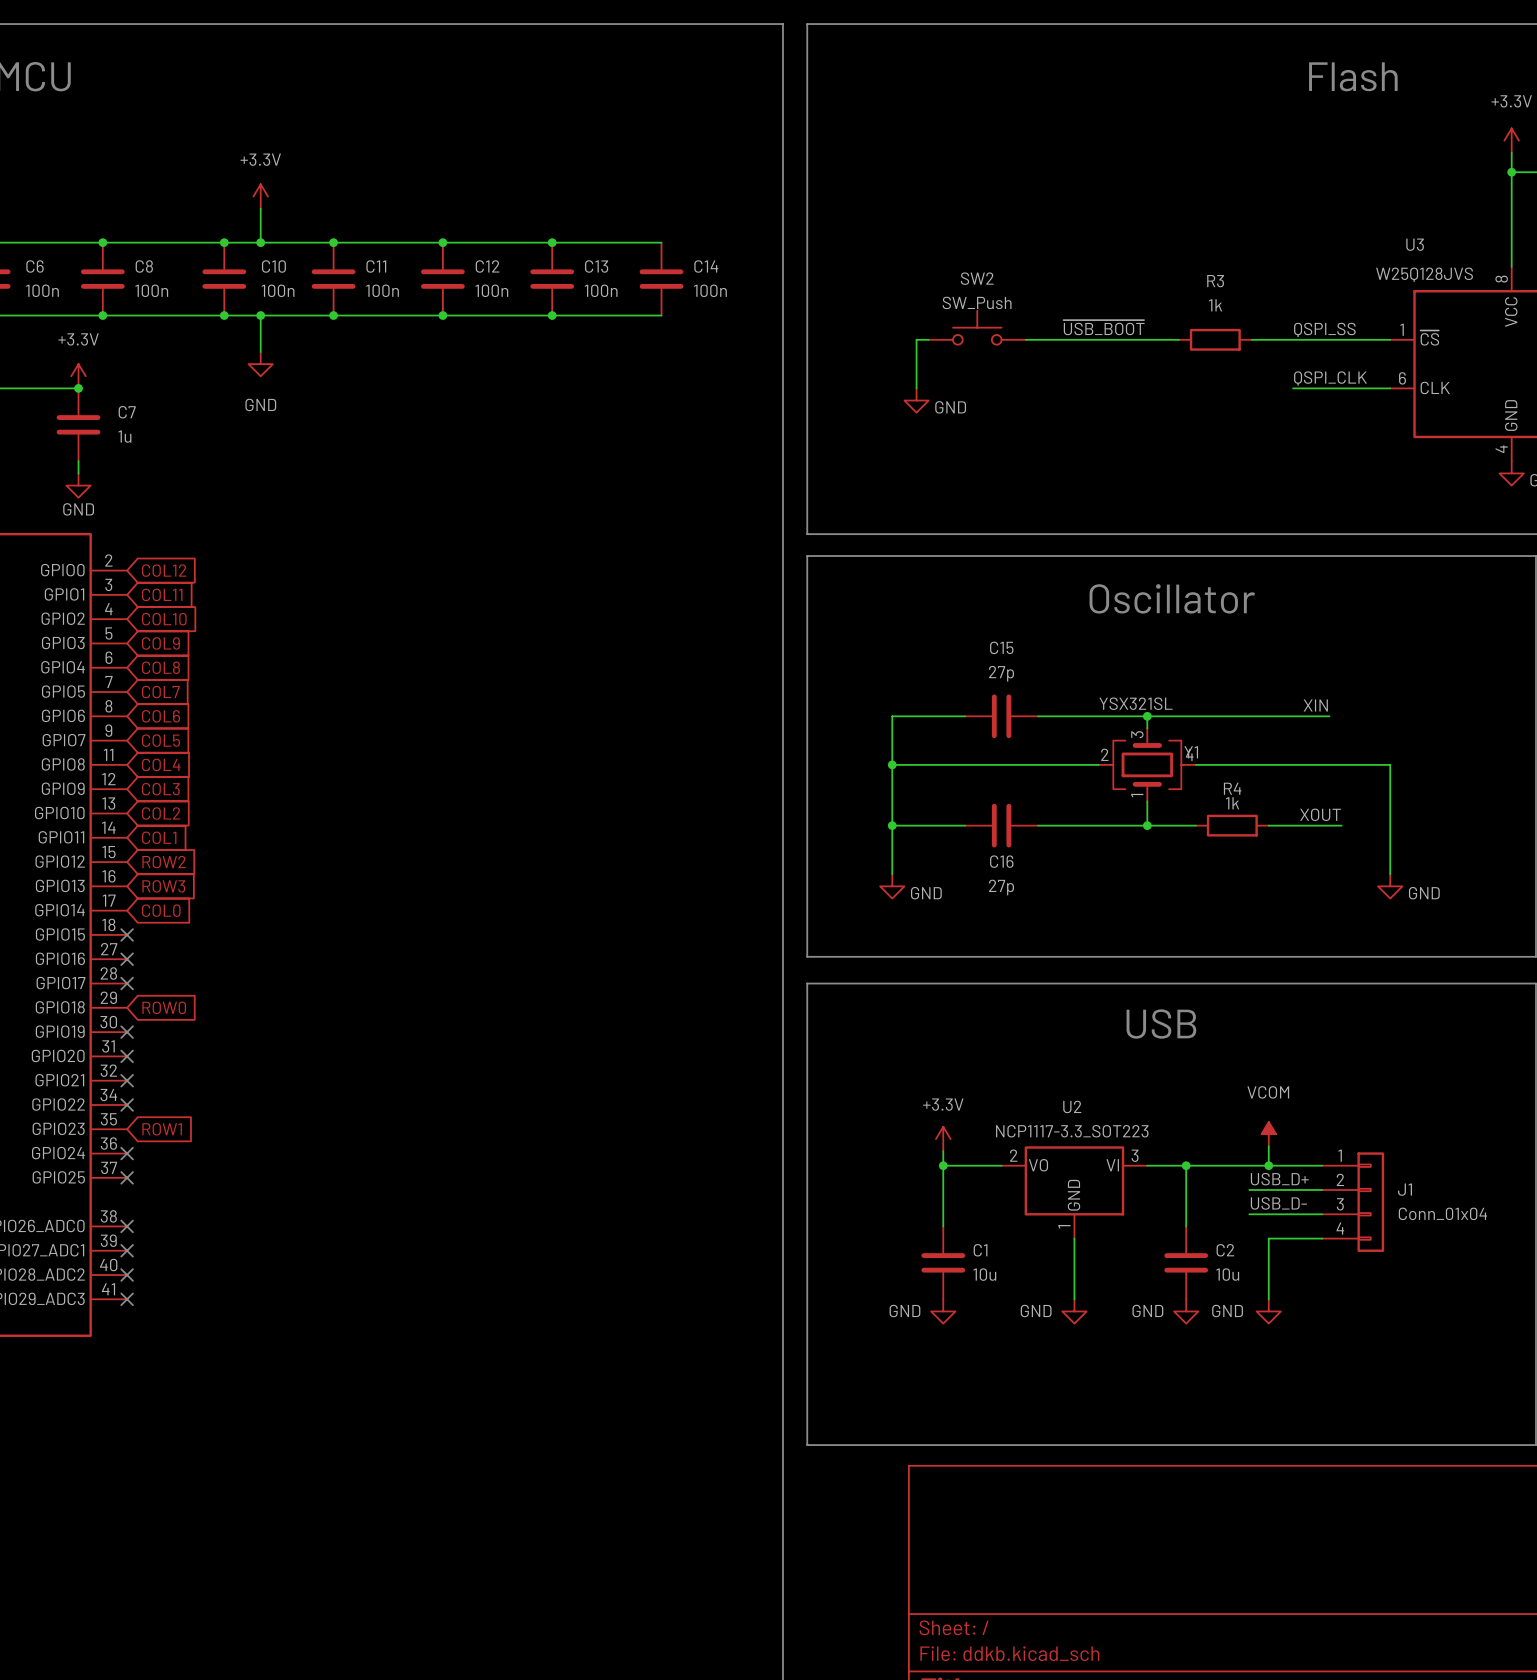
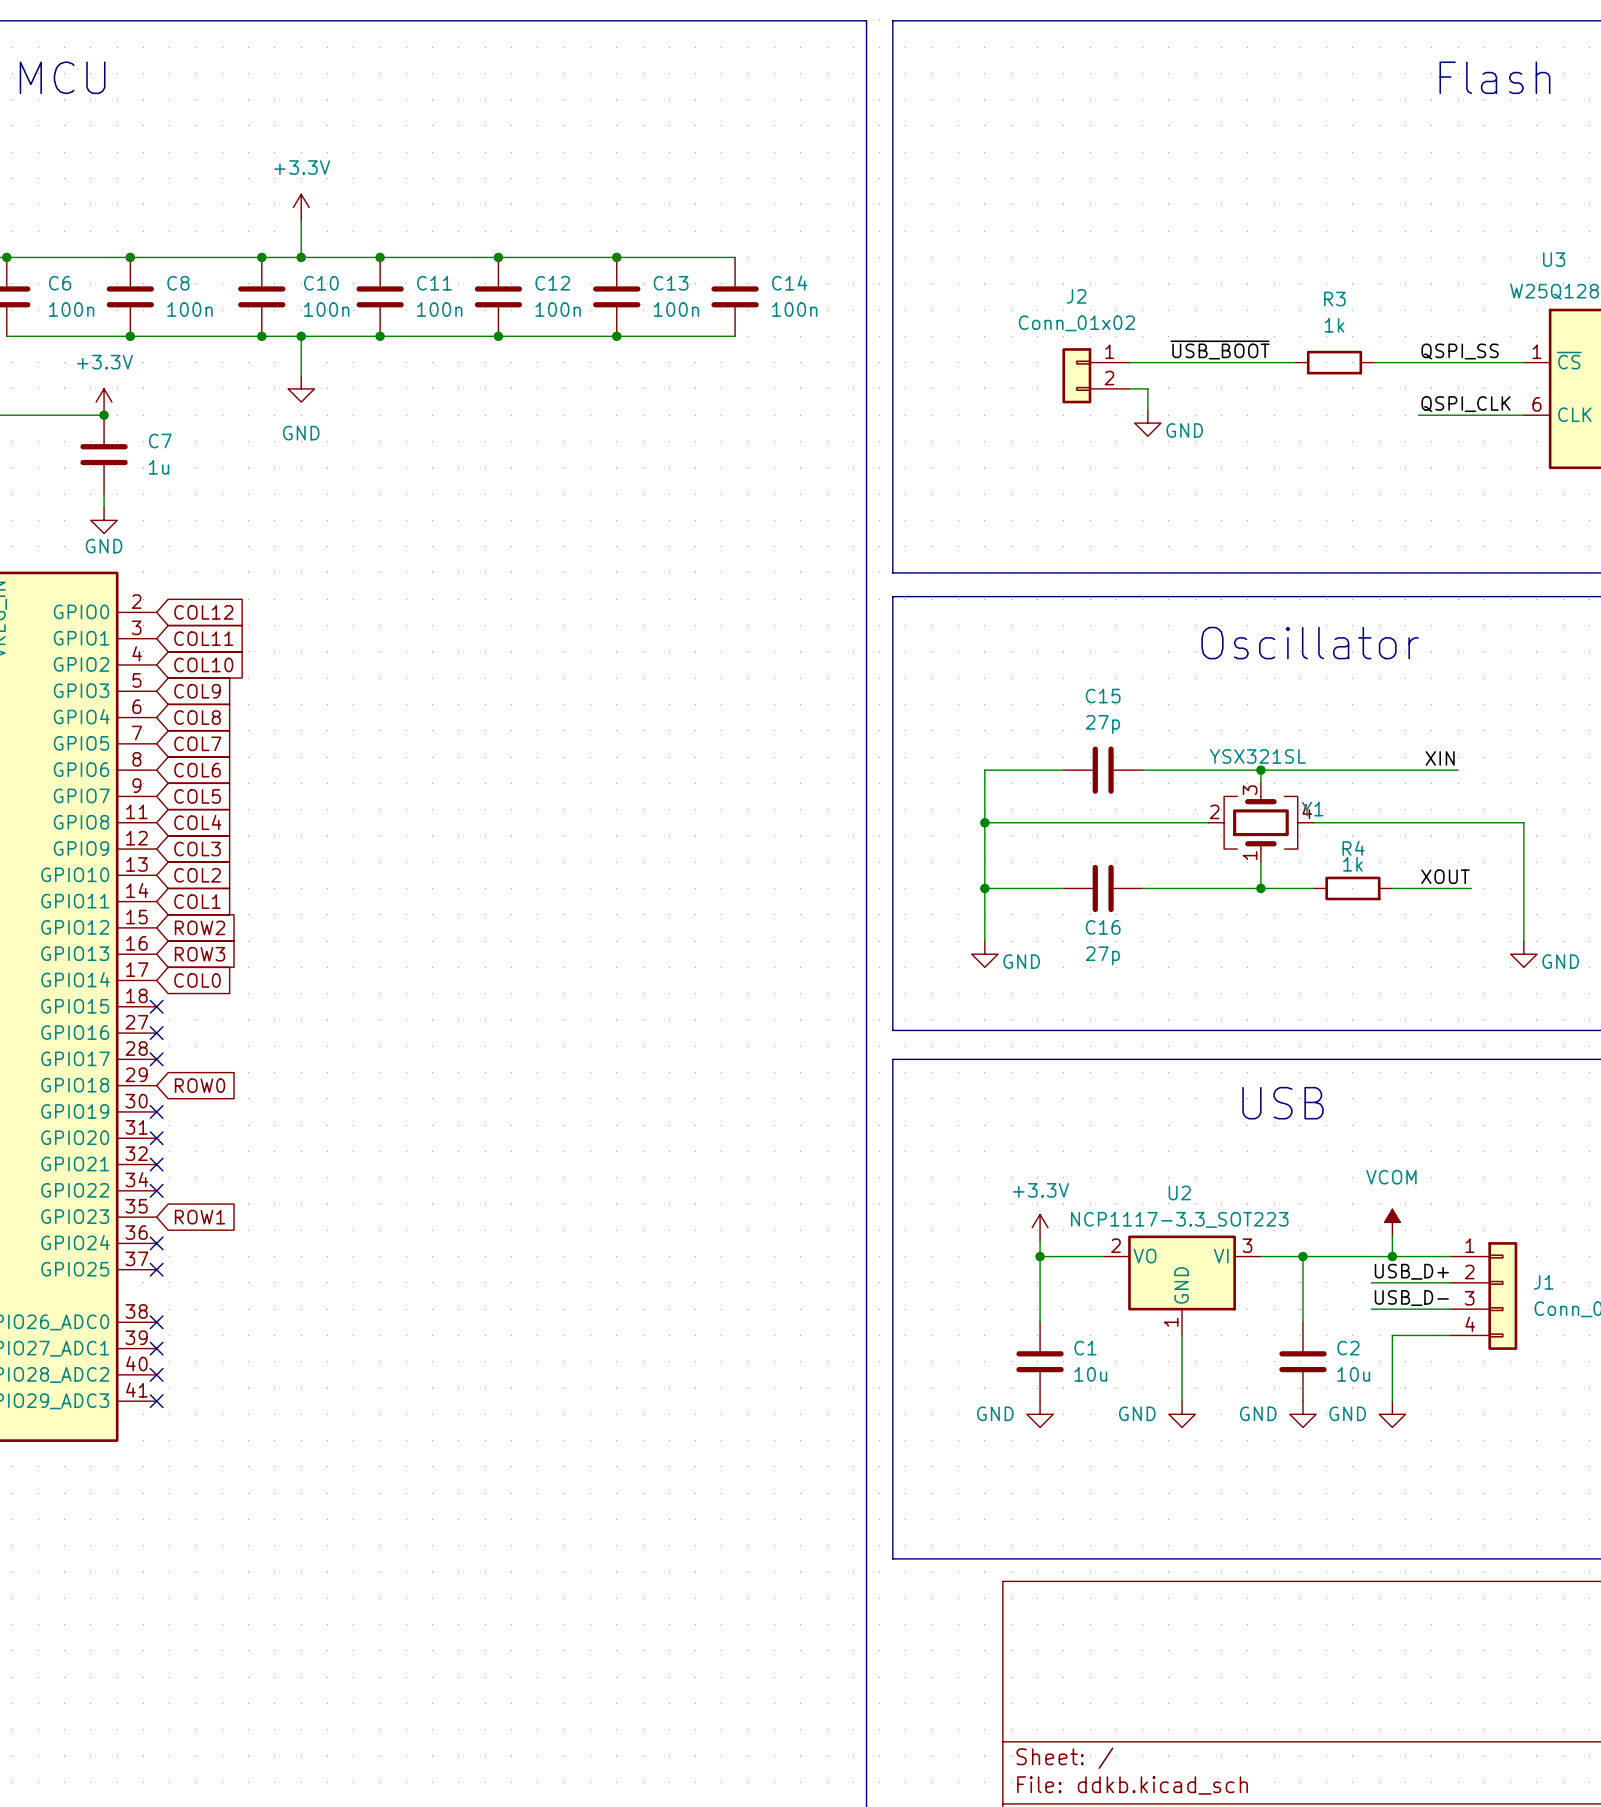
SW2: SW_Push (977, 327) -> none
wire: (928, 339) (916, 339) (916, 388) -> none
J2: none -> Conn_01x02 (1095, 375)
wire: none -> (1129, 388) (1147, 388) (1147, 409)
power symbol position: GND (916, 400) -> GND (1147, 423)

